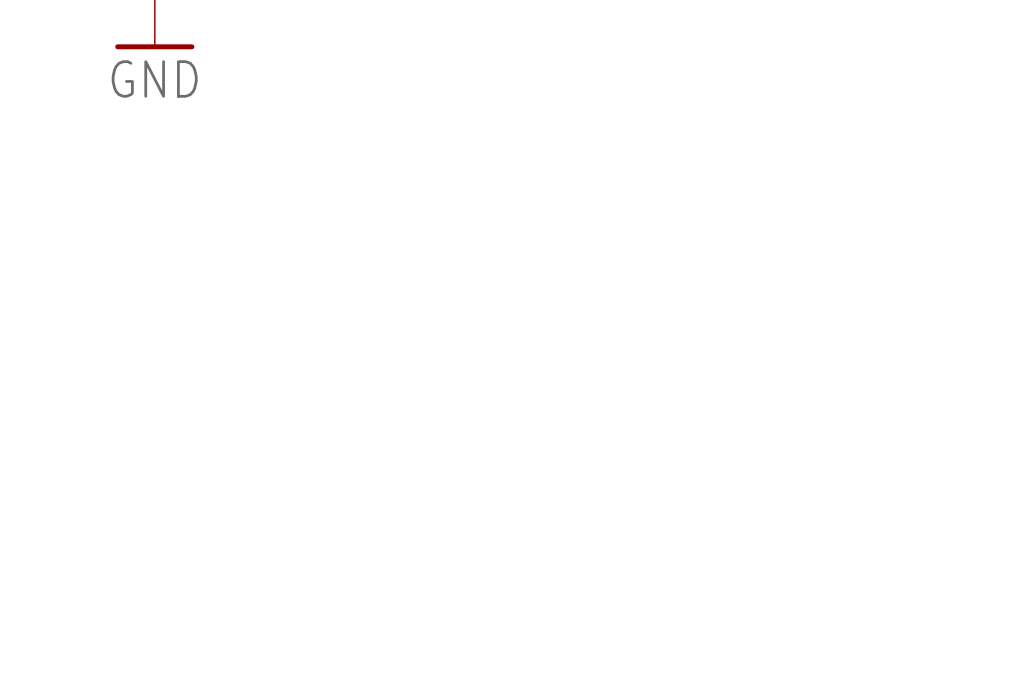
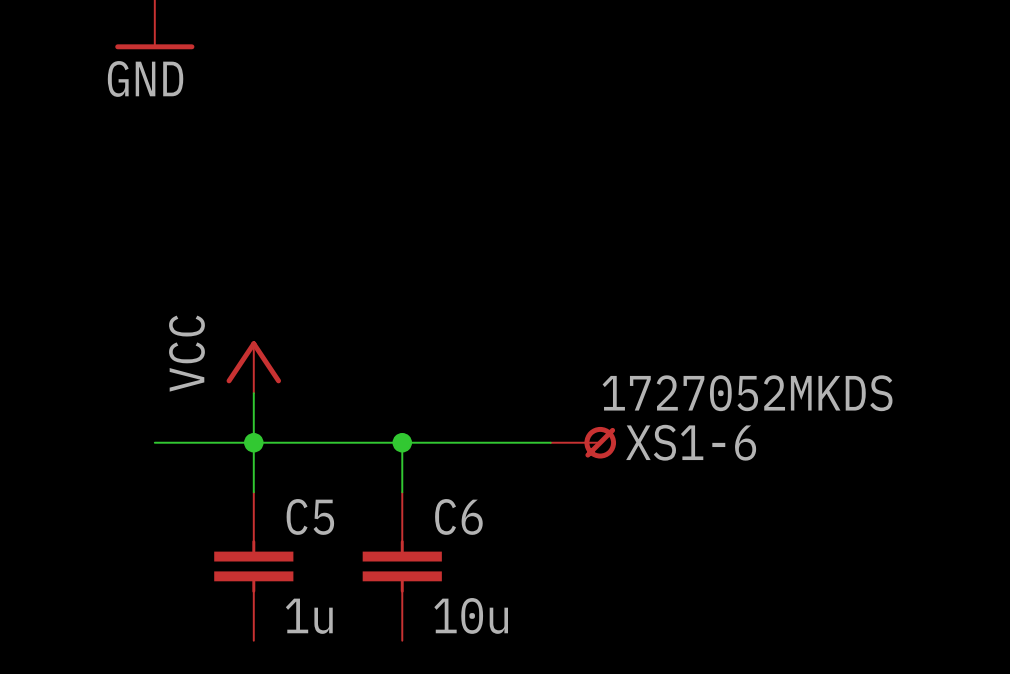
power symbol: none -> VCC (253, 367)
wire: none -> (253, 393) (253, 492)
wire: none -> (154, 442) (550, 442)
junction: none -> (253, 442)
wire: none -> (402, 442) (402, 492)
junction: none -> (402, 442)
XS1-6: none -> 1727052MKDS (583, 442)
C5: none -> 1u (253, 566)
C6: none -> 10u (402, 566)

